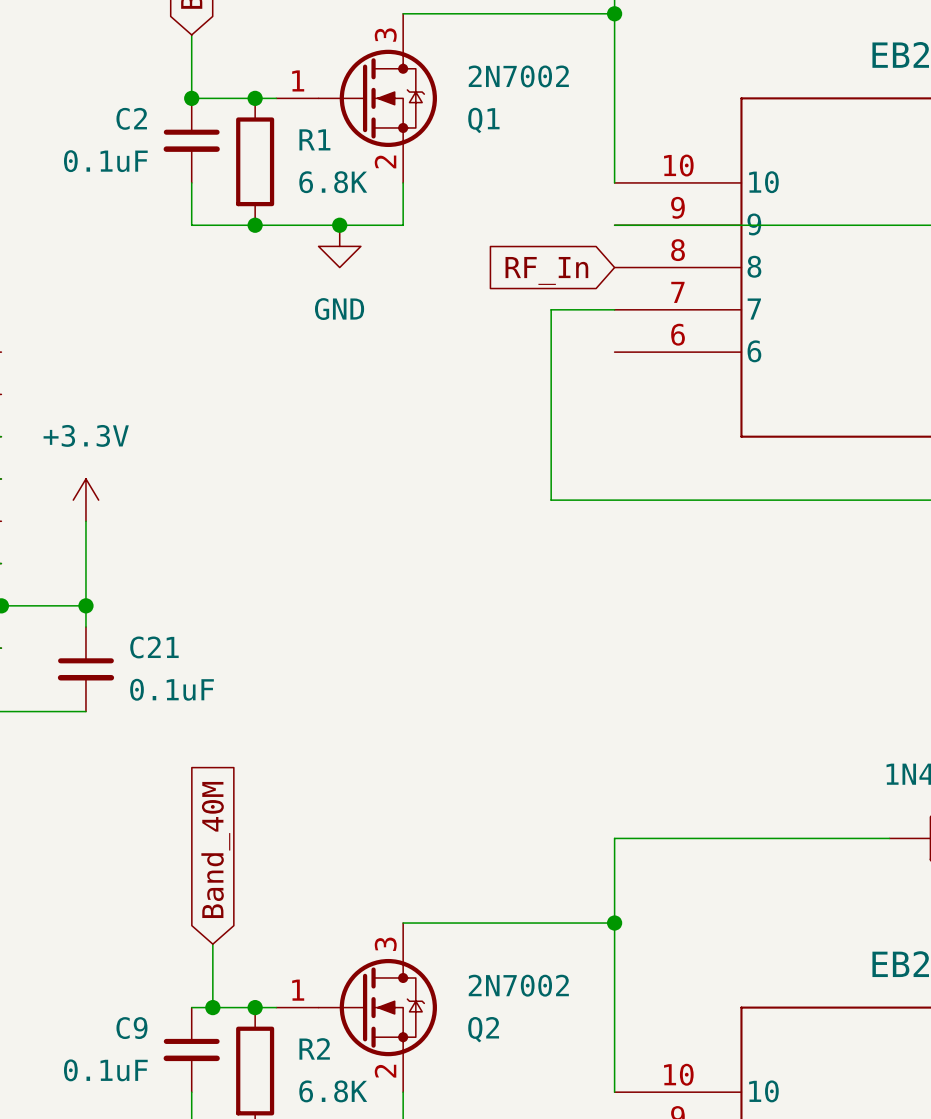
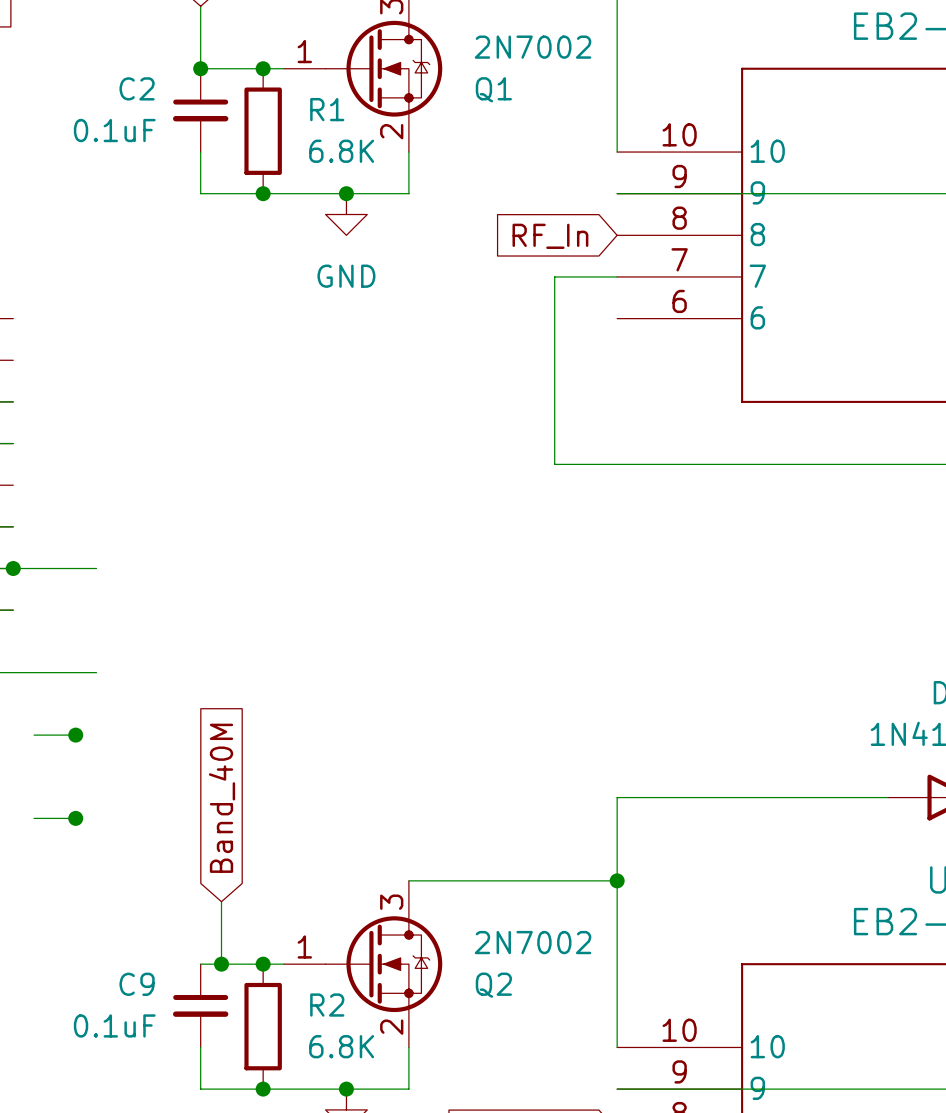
power symbol: +3.3V (85, 500) -> none
wire: (85, 521) (85, 626) -> none
junction: (85, 605) -> none
C21: 0.1uF (85, 669) -> none
wire: none -> (34, 735) (75, 735)
junction: none -> (75, 735)
wire: none -> (34, 818) (75, 818)
junction: none -> (75, 818)

